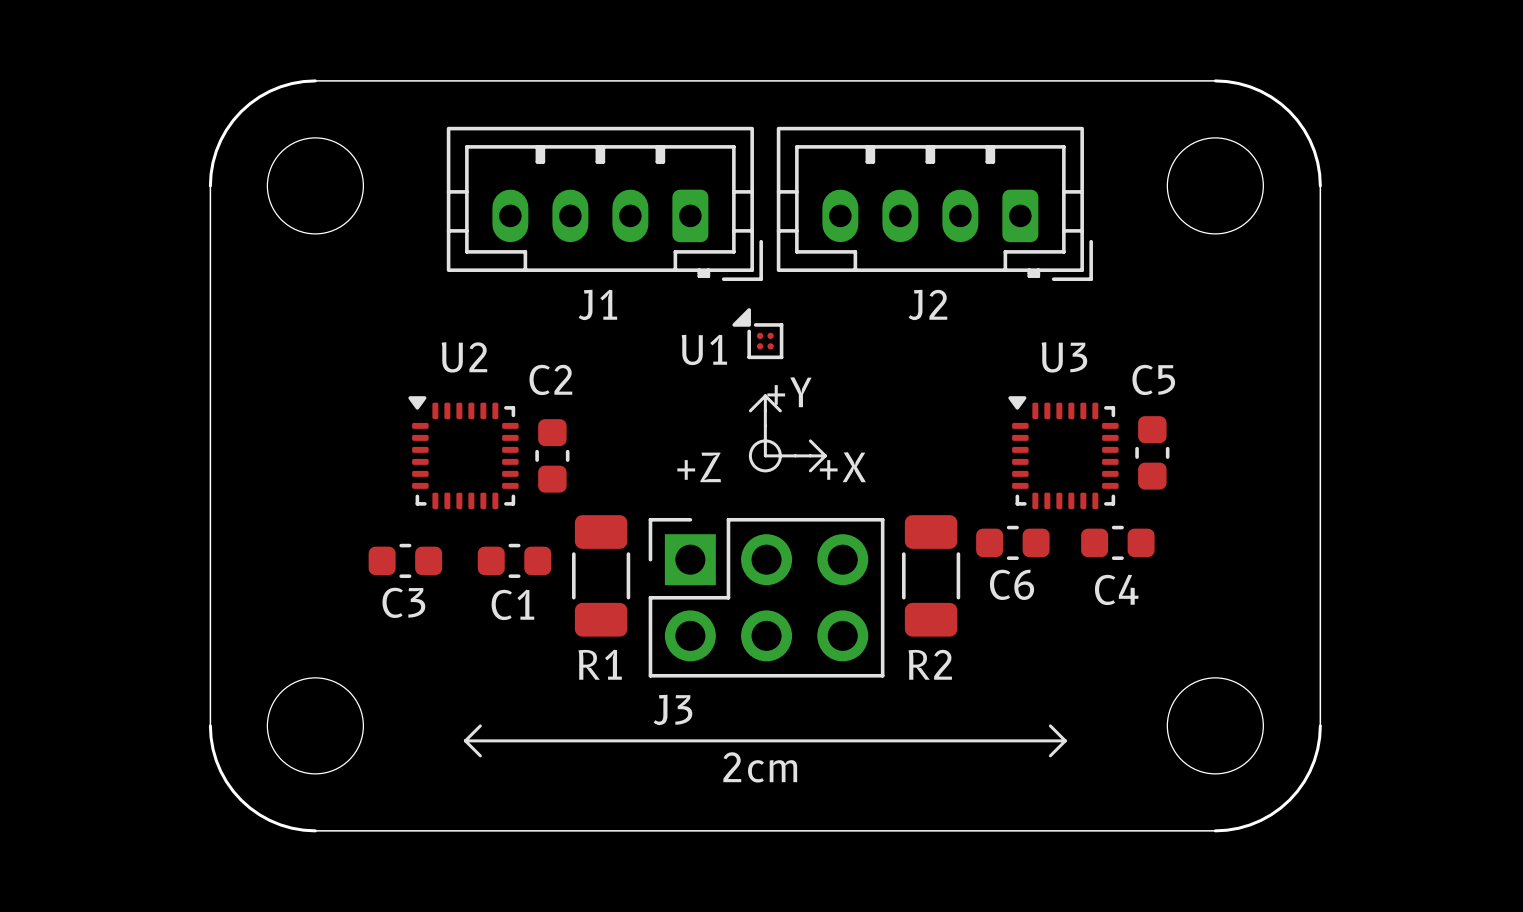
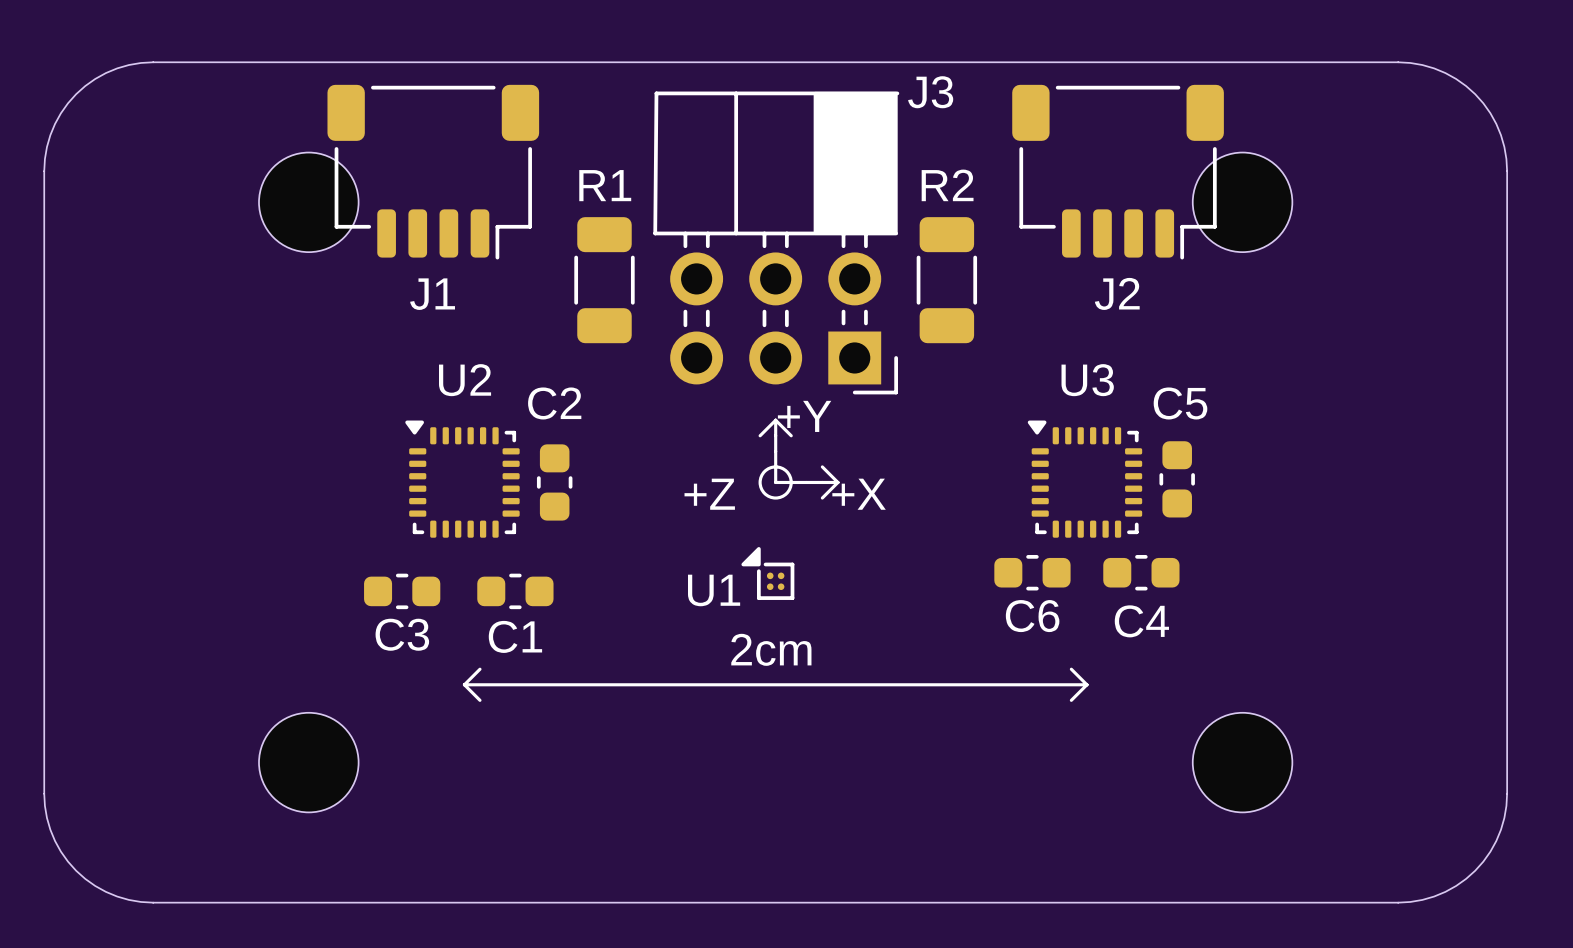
board edge: (315, 80) (1215, 80) (1250, 86) (1280, 103) (1297, 120) (1309, 140) (1317, 162) (1320, 185) (1320, 725) (1314, 760) (1297, 791) (1280, 807) (1260, 820) (1238, 828) (1215, 830) (315, 830) (280, 824) (249, 807) (226, 781) (216, 760) (211, 737) (211, 174) (216, 151) (226, 130) (249, 103) (280, 86) (315, 80) -> (153, 62) (128, 65) (105, 73) (76, 94) (55, 123) (44, 159) (44, 805) (50, 829) (60, 851) (76, 870) (95, 885) (117, 896) (153, 902) (1398, 902) (1434, 896) (1456, 885) (1475, 870) (1490, 851) (1501, 829) (1507, 793) (1507, 171) (1501, 135) (1490, 113) (1475, 94) (1456, 78) (1434, 68) (1398, 62) (153, 62)
J1 footprint: [446, 126, 763, 281] -> [327, 84, 540, 260]
J2 footprint: [776, 126, 1093, 281] -> [1012, 84, 1224, 260]
U1 position: (757, 333) -> (767, 573)
J3 footprint: [648, 517, 885, 678] -> [653, 91, 900, 395]
R1 position: (601, 575) -> (604, 280)
R2 position: (931, 575) -> (946, 280)
R1 name position: R1 (600, 664) -> R1 (605, 185)
R2 name position: R2 (930, 664) -> R2 (947, 185)
J3 name position: J3 (672, 709) -> J3 (930, 92)
line: (480, 725) (465, 740) -> (479, 669) (464, 684)
line: (1050, 725) (1065, 740) -> (1071, 669) (1086, 684)
line: (465, 740) (1065, 740) -> (464, 684) (1086, 684)
line: (465, 740) (480, 755) -> (464, 684) (479, 700)
line: (1065, 740) (1050, 755) -> (1086, 684) (1071, 700)
text position: 2cm (760, 767) -> 2cm (771, 649)

